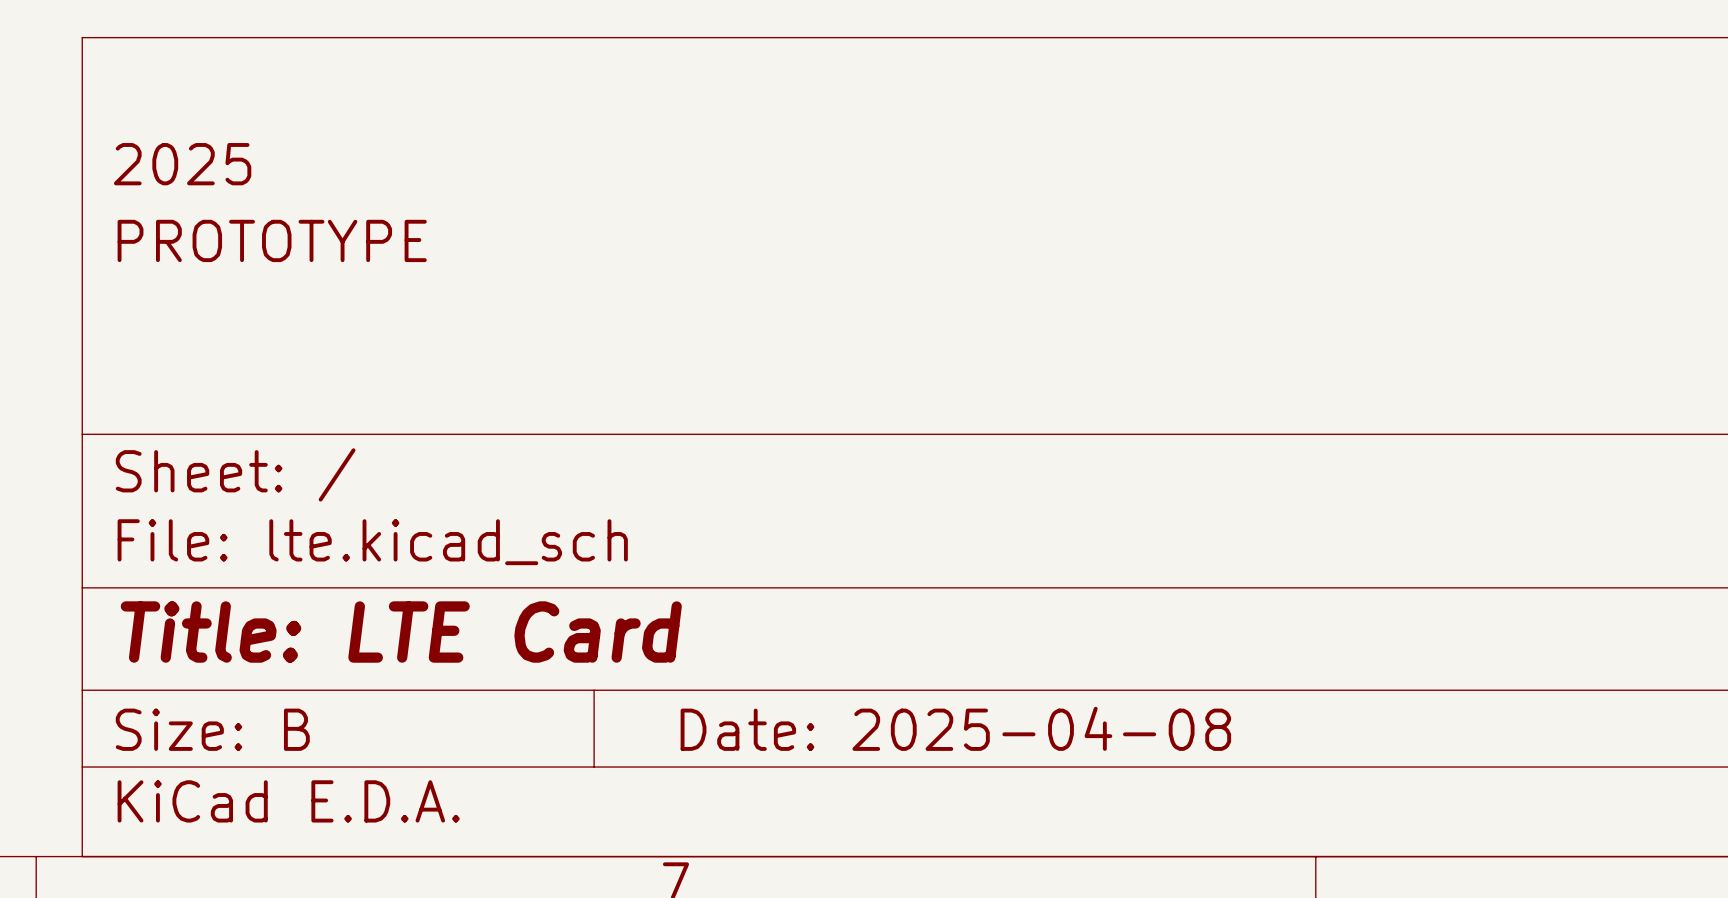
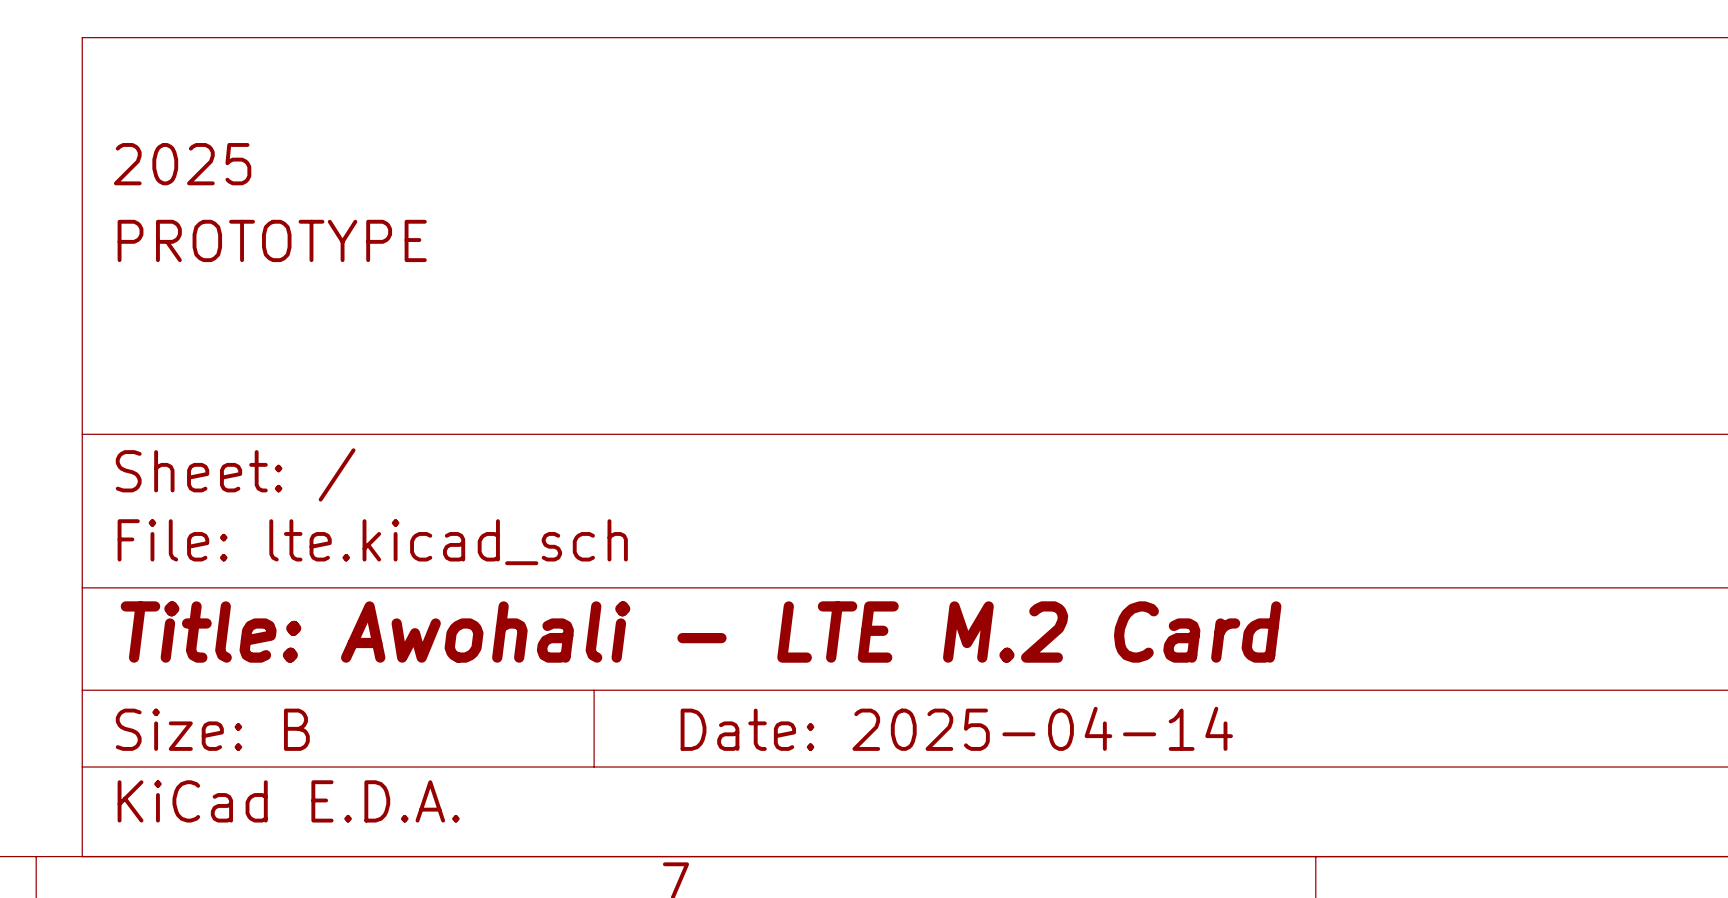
title block: Title: LTE Card (401, 632) -> Title: Awohali - LTE M.2 Card (701, 632)
title block: Date: 2025-04-08 (955, 728) -> Date: 2025-04-14 (956, 728)

